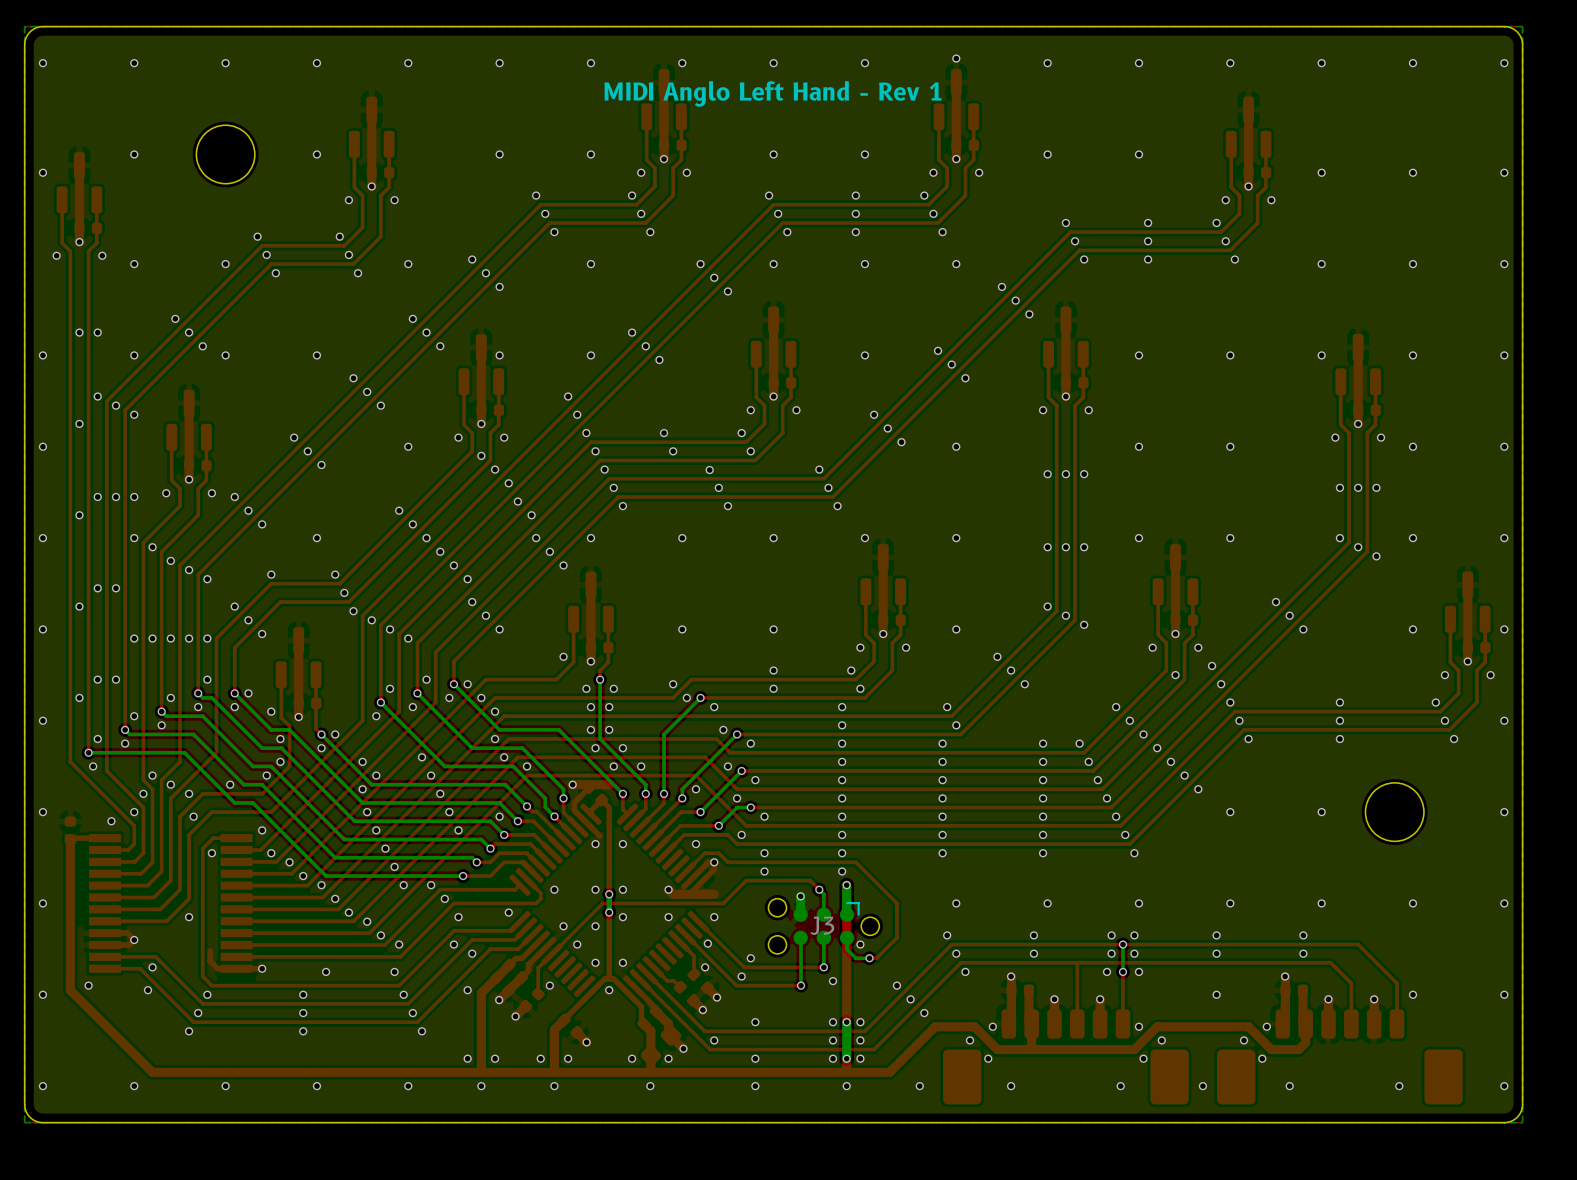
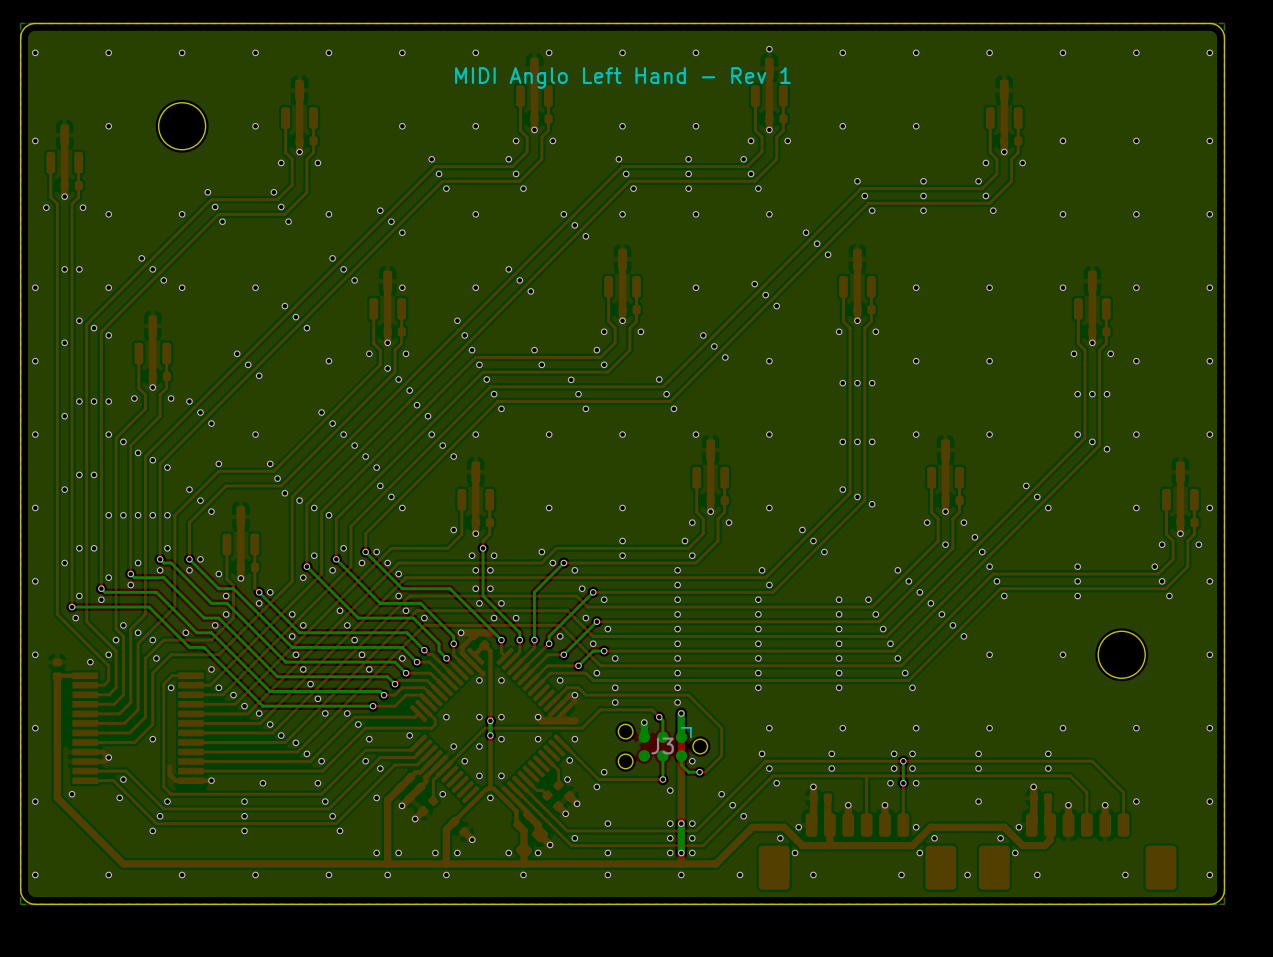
top track: (685, 934) (736, 985) (801, 985) -> none
bottom track: (800, 937) (801, 985) -> none
via: (801, 985) -> none

